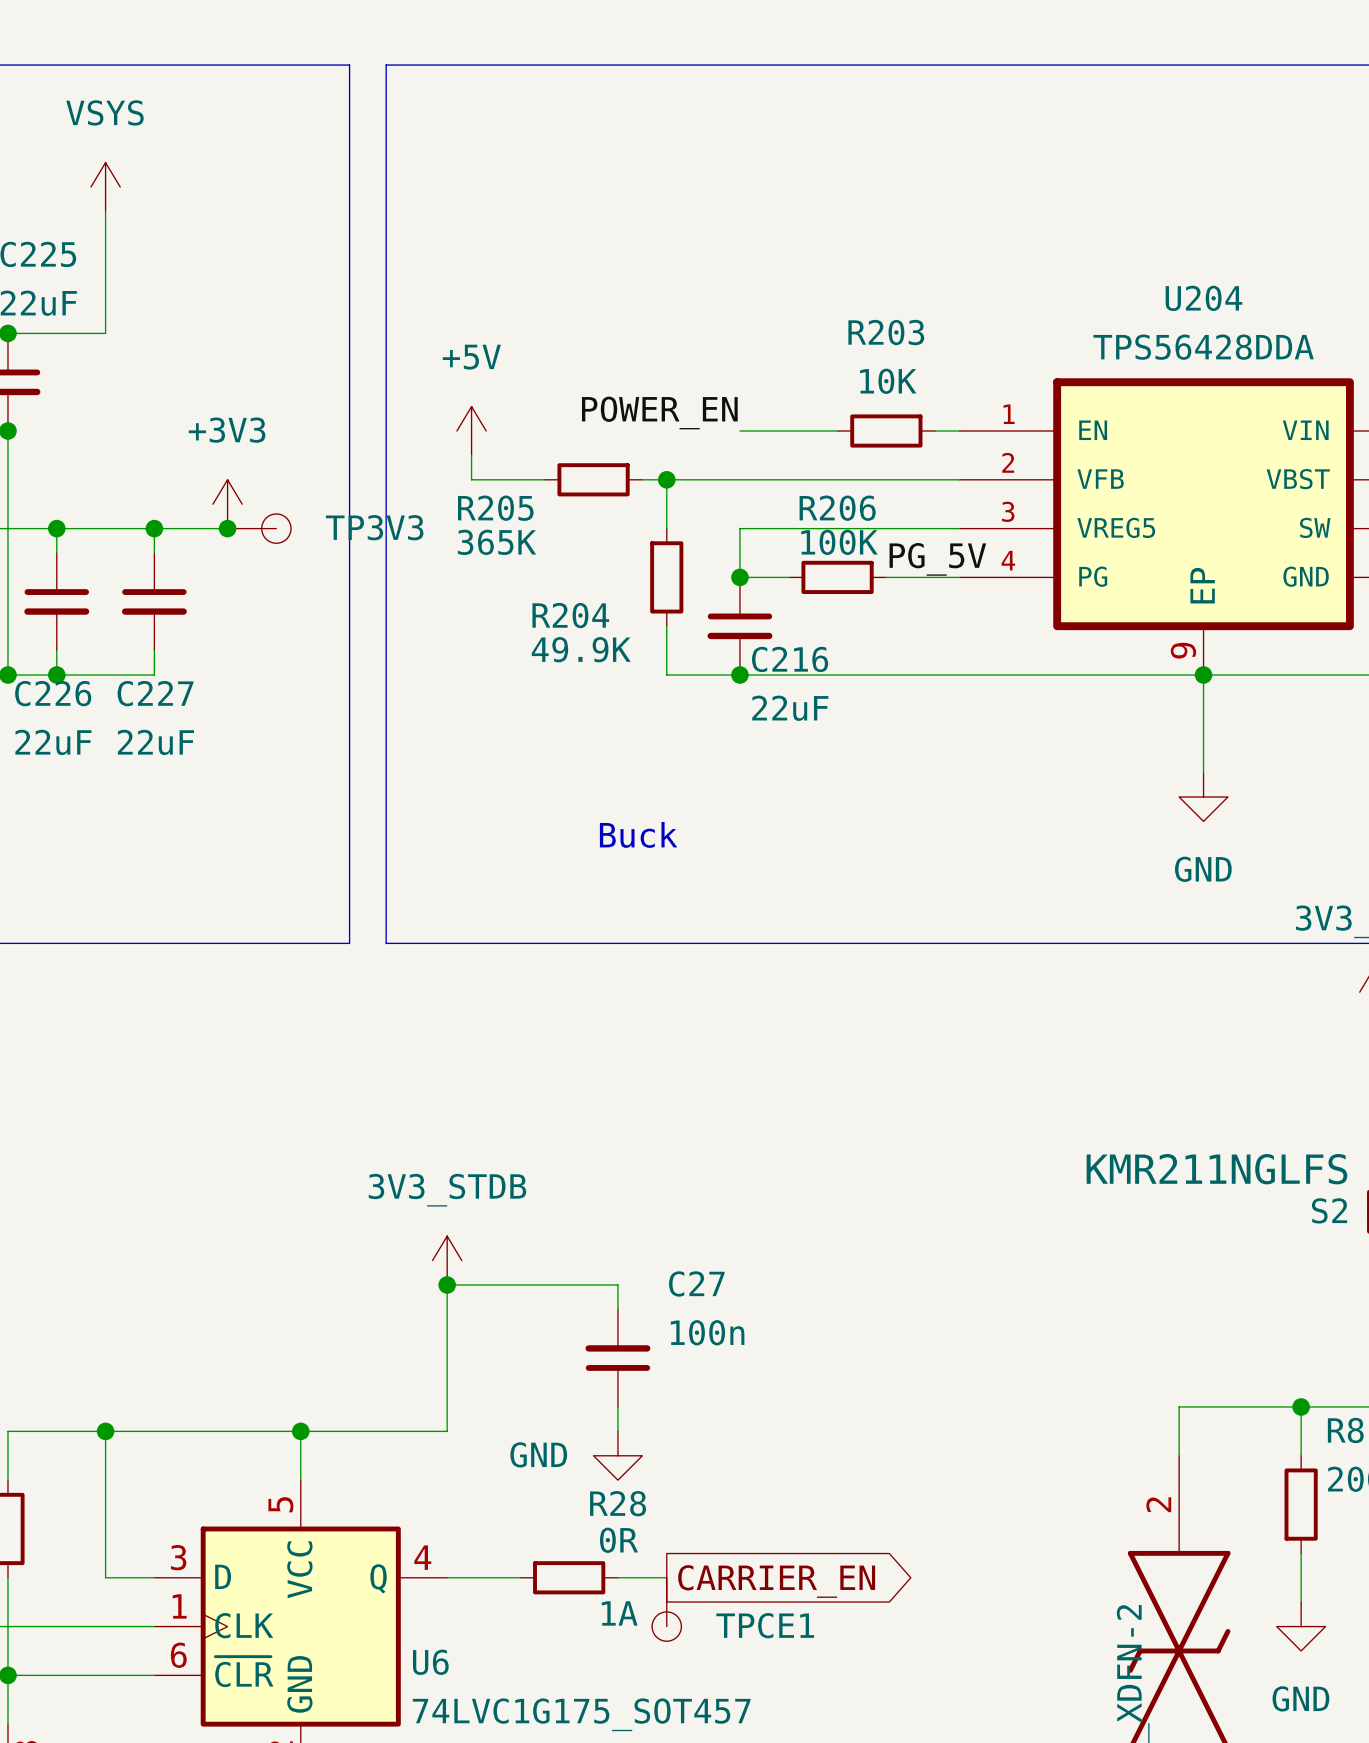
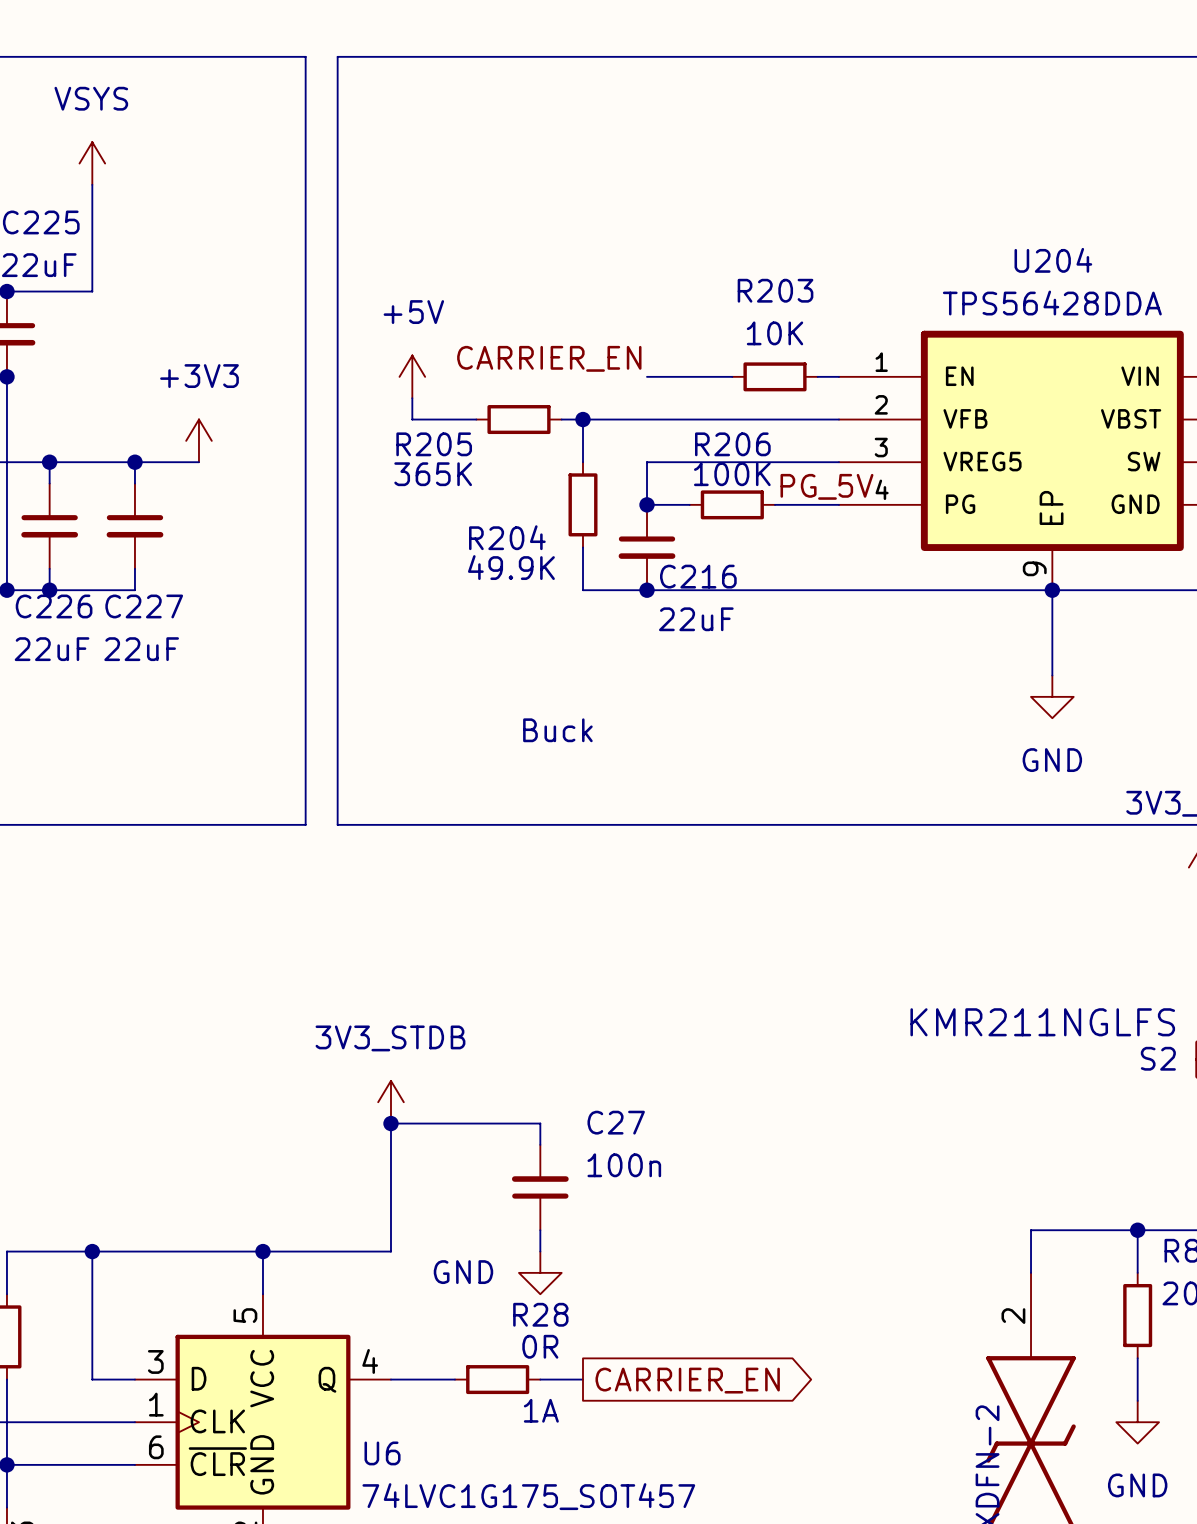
label: POWER_EN (659, 412) -> CARRIER_EN (549, 358)
junction: (227, 528) -> none
TP3V3: (259, 528) -> none
TPCE1: (666, 1609) -> none

